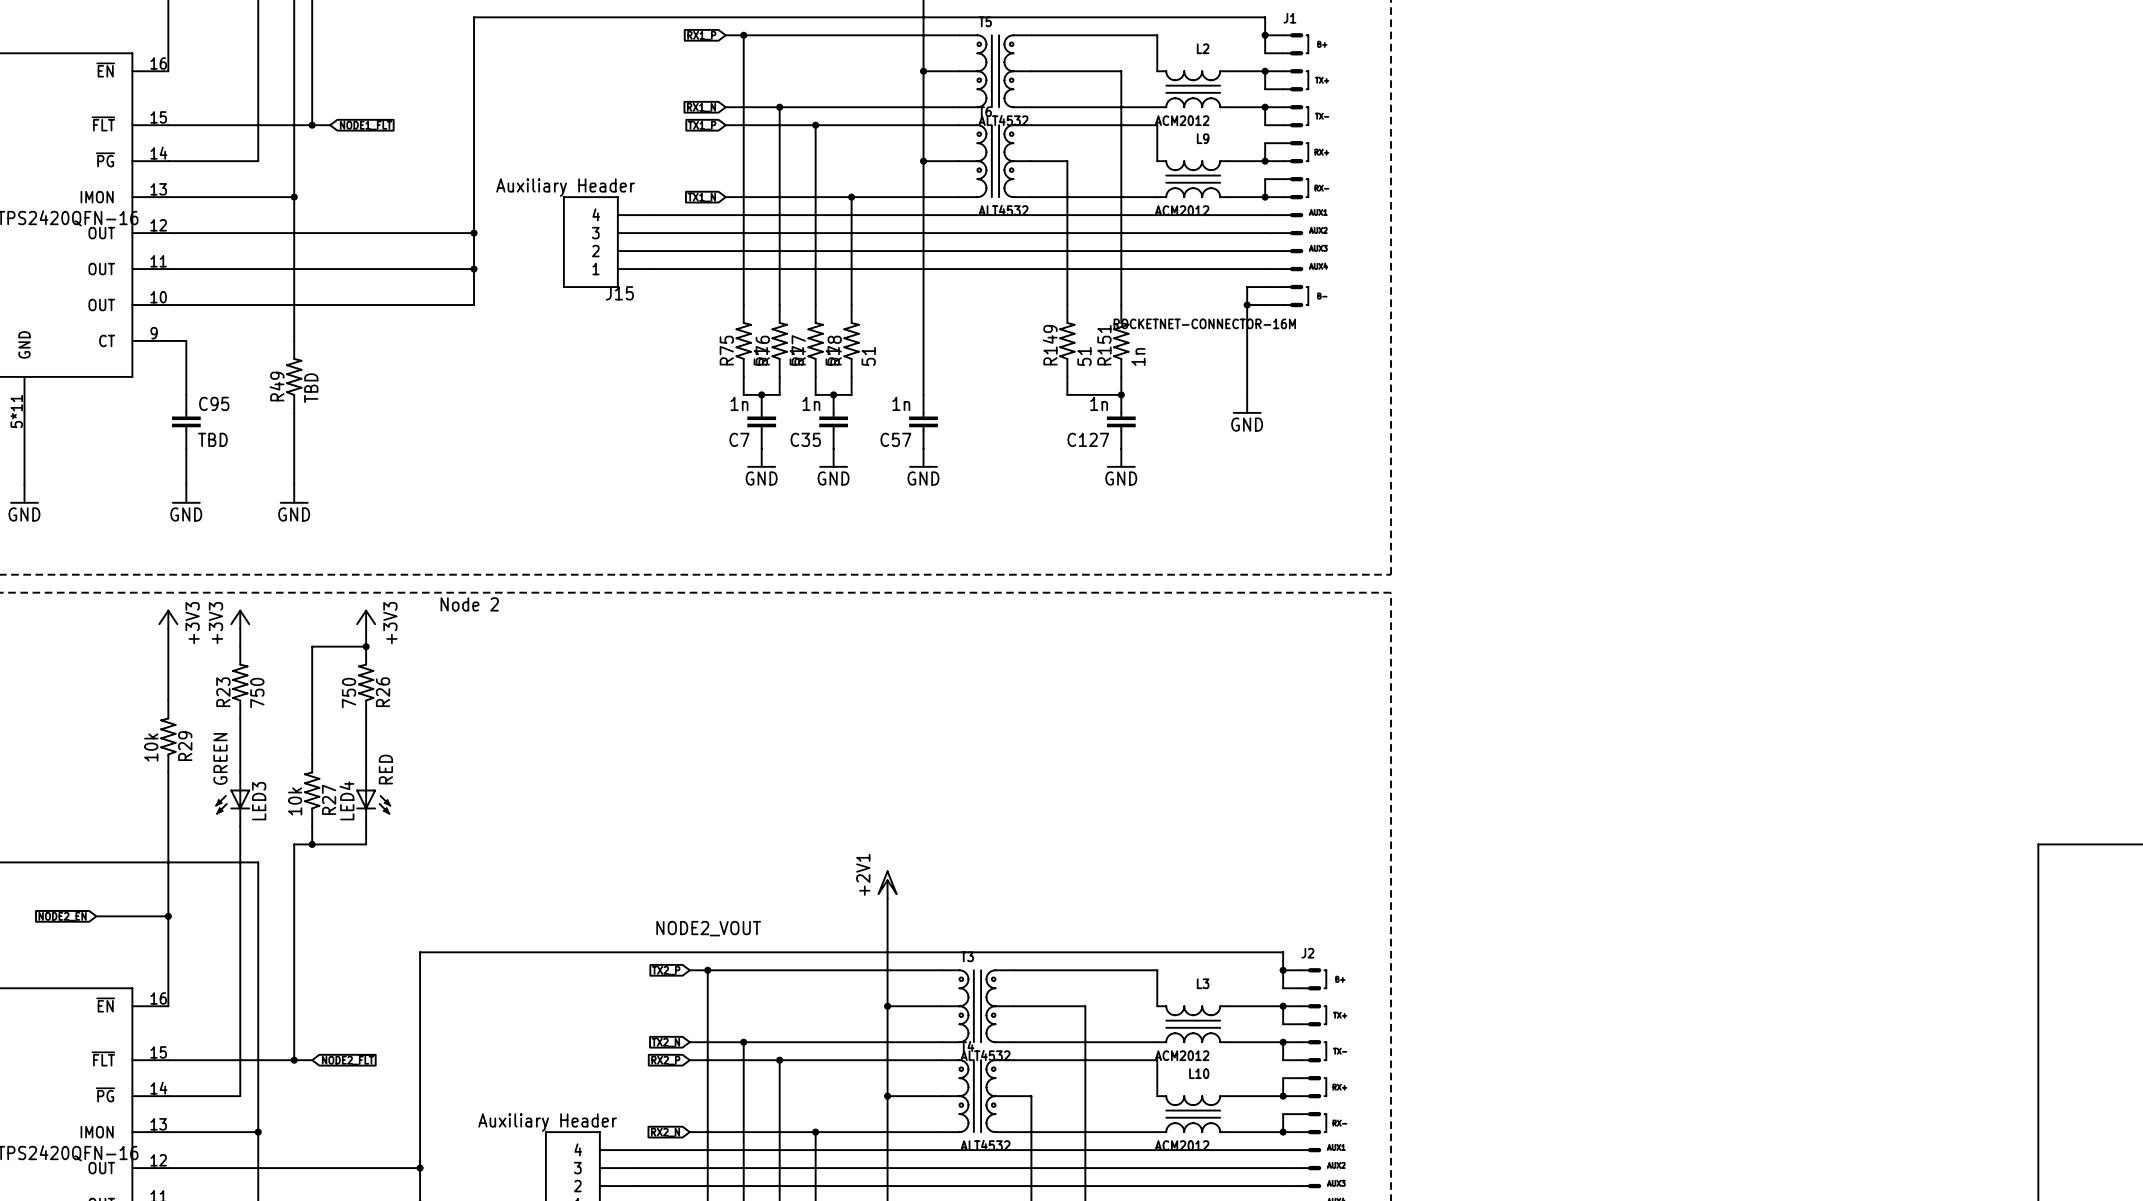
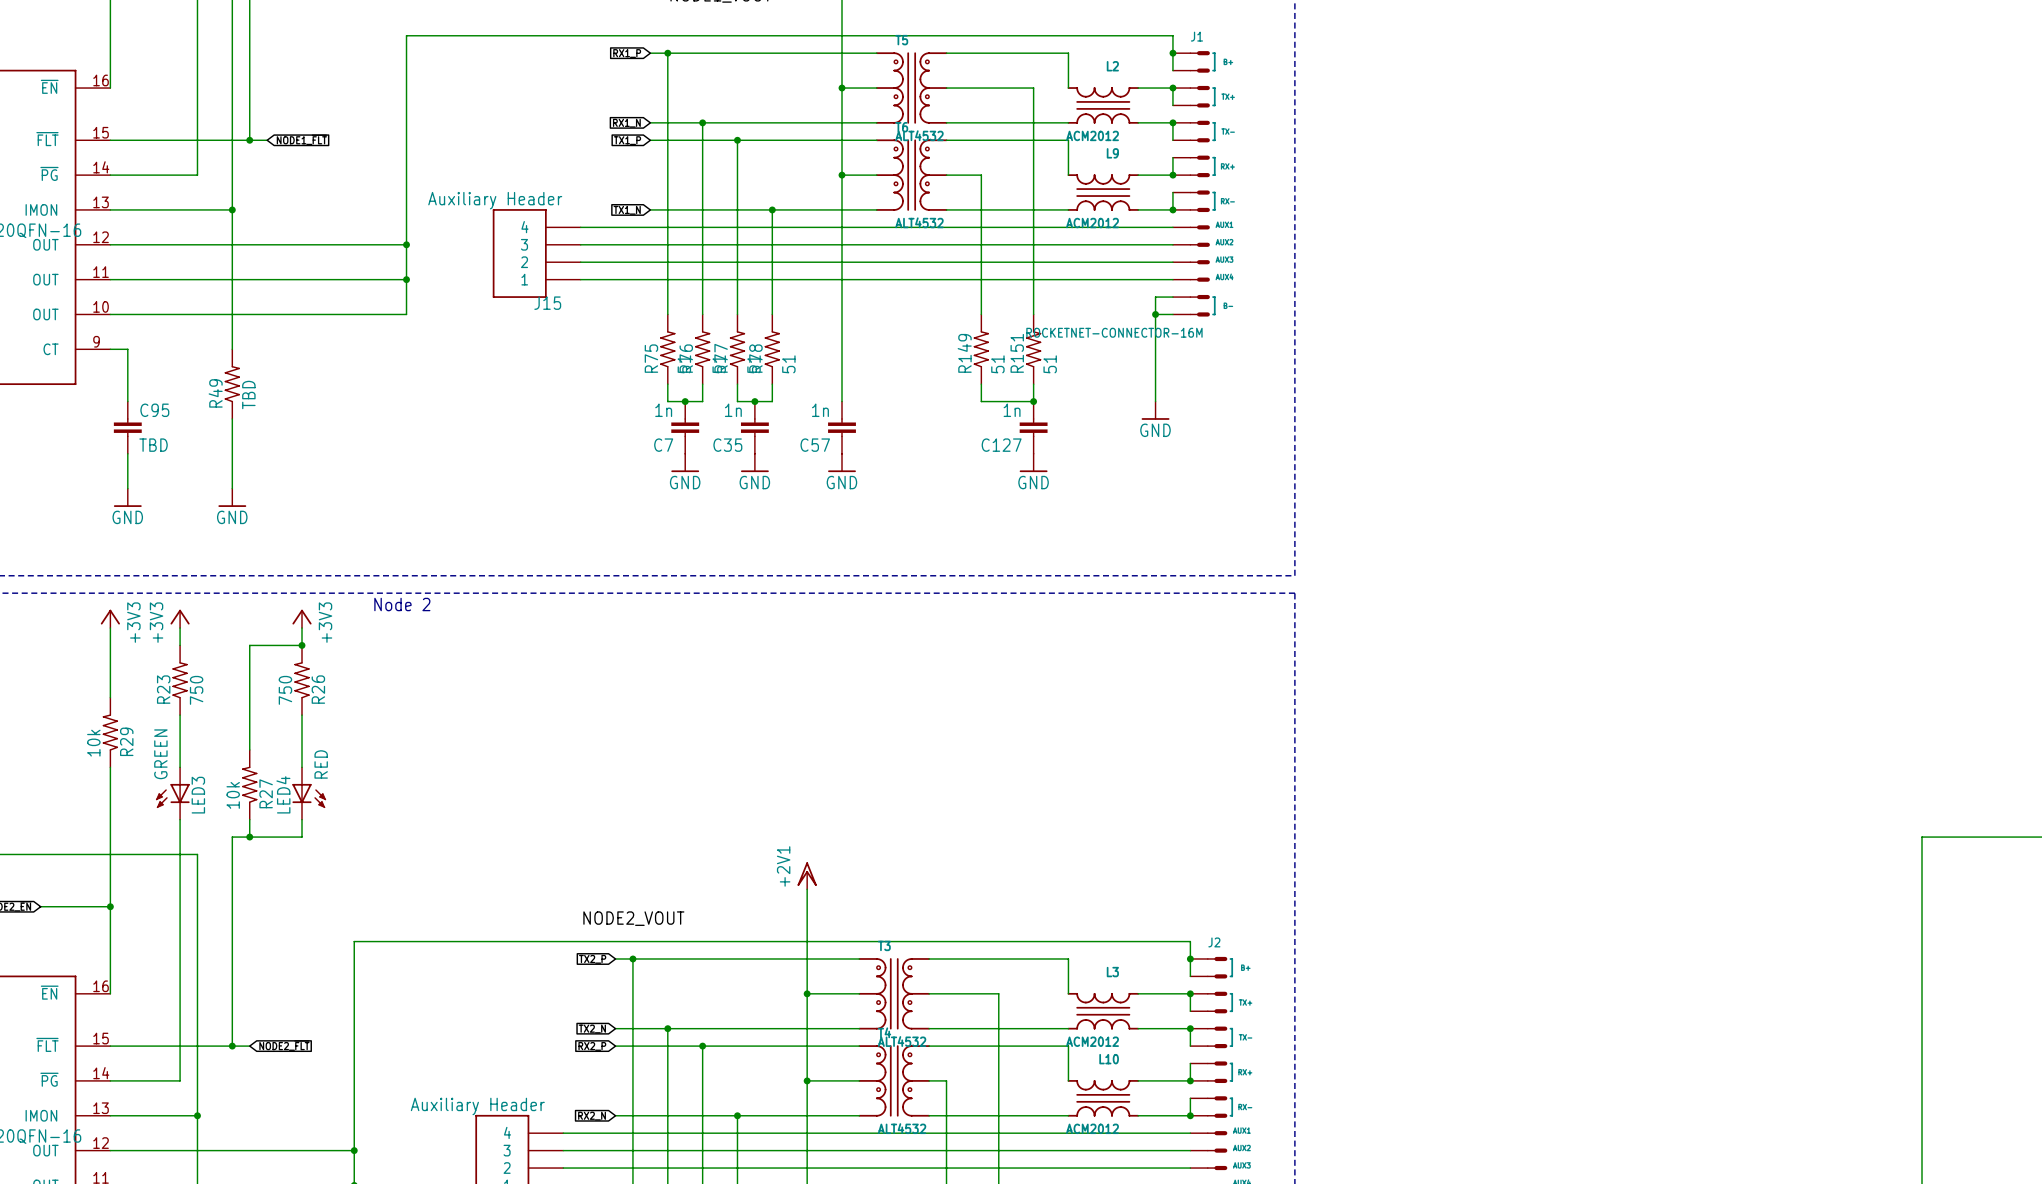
R151 value: 1n (1138, 357) -> 51 (1050, 364)

